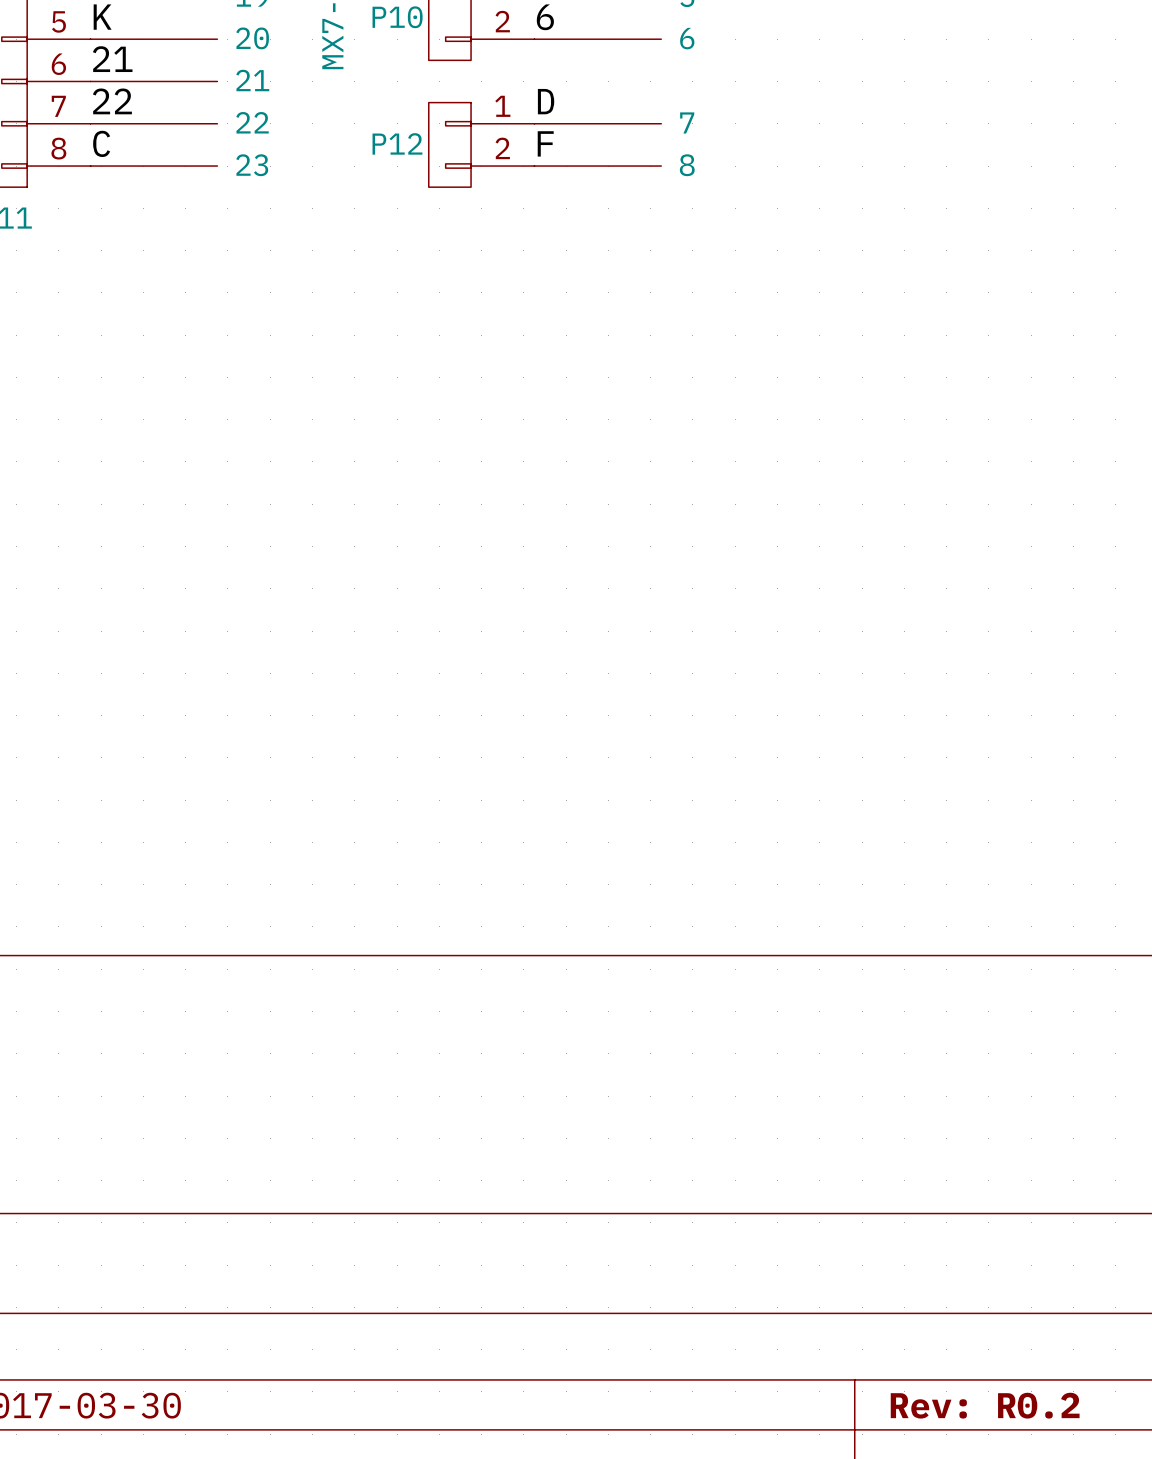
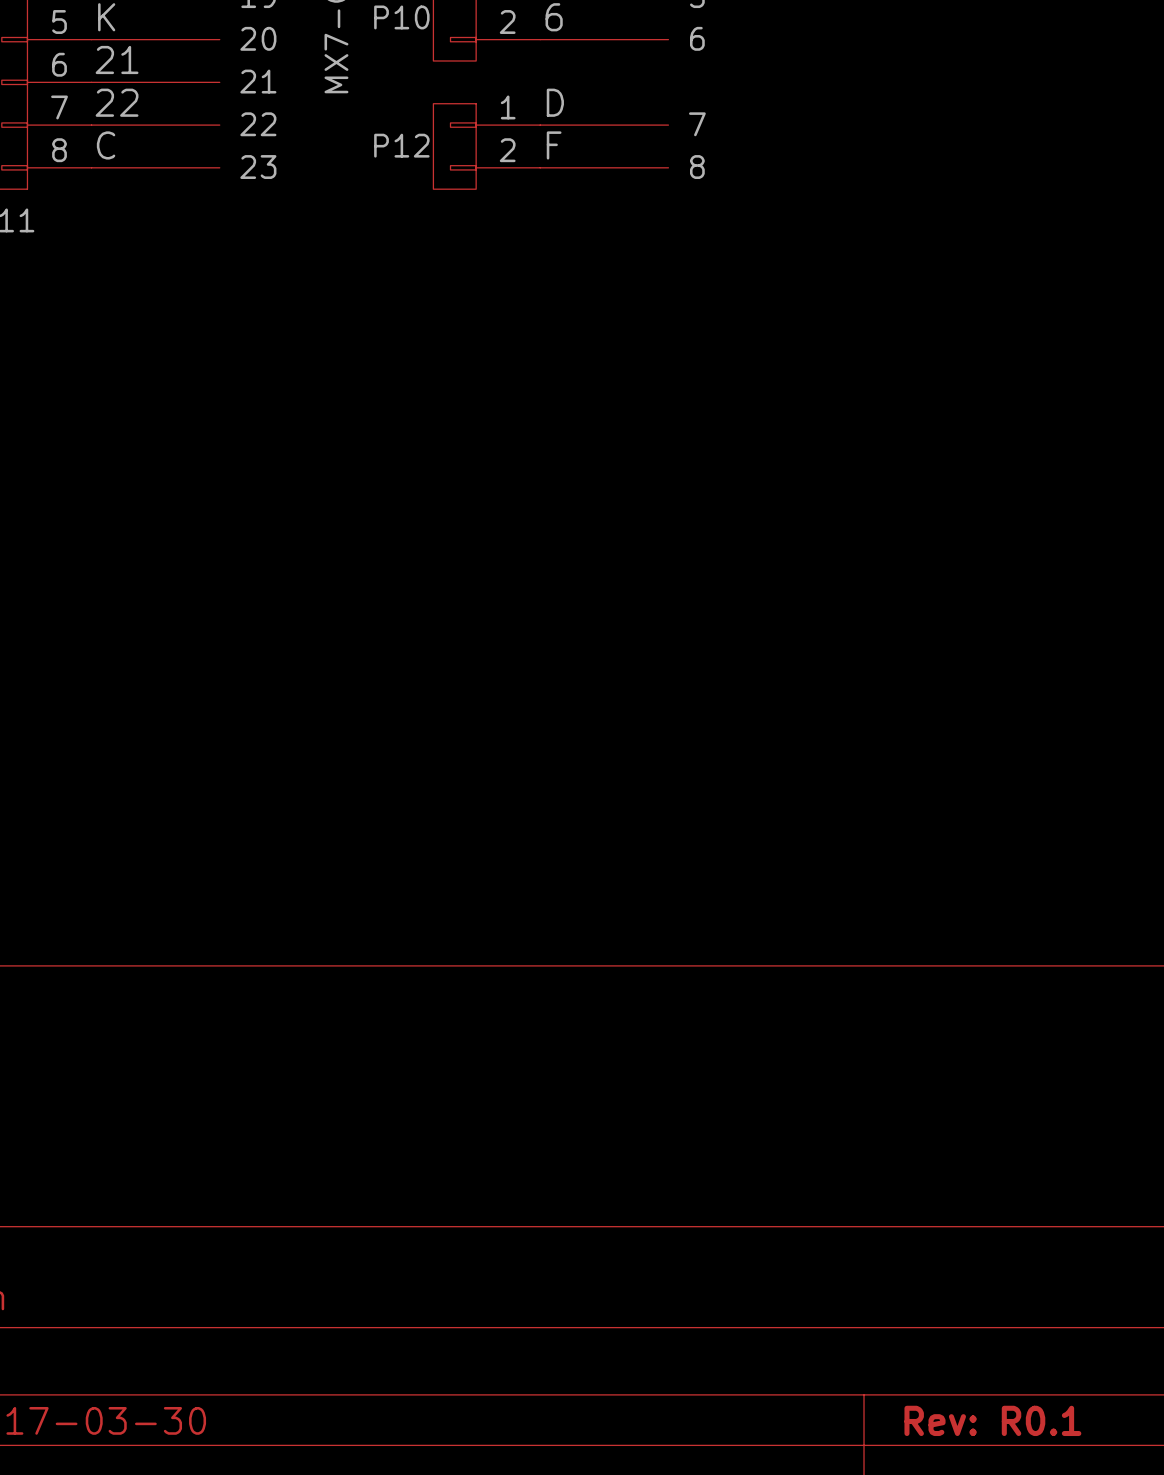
title block: Rev: R0.2 (985, 1405) -> Rev: R0.1 (992, 1420)

